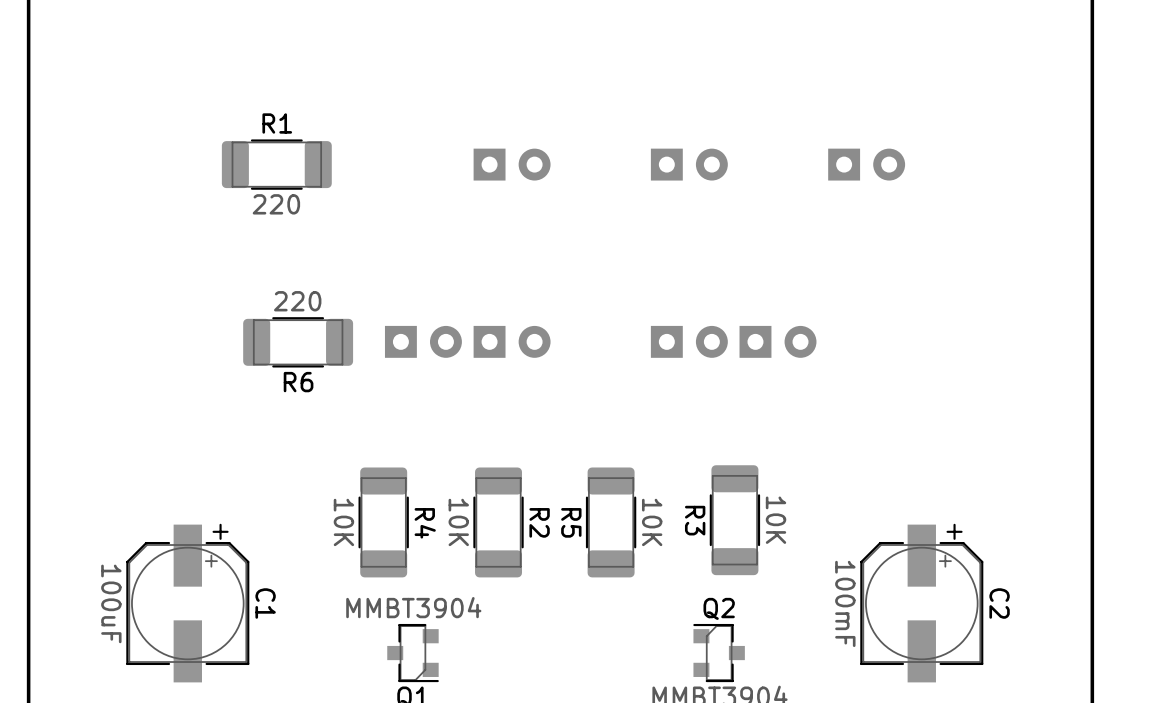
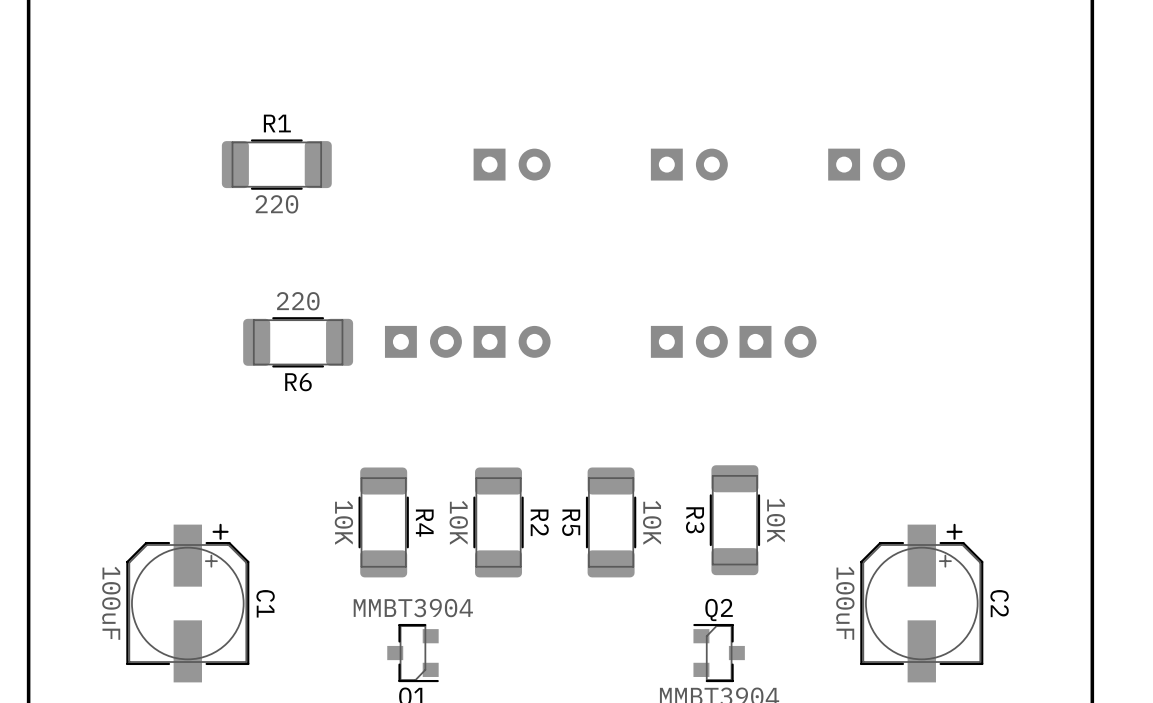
C2 value: 100mF (845, 603) -> 100uF (845, 603)

